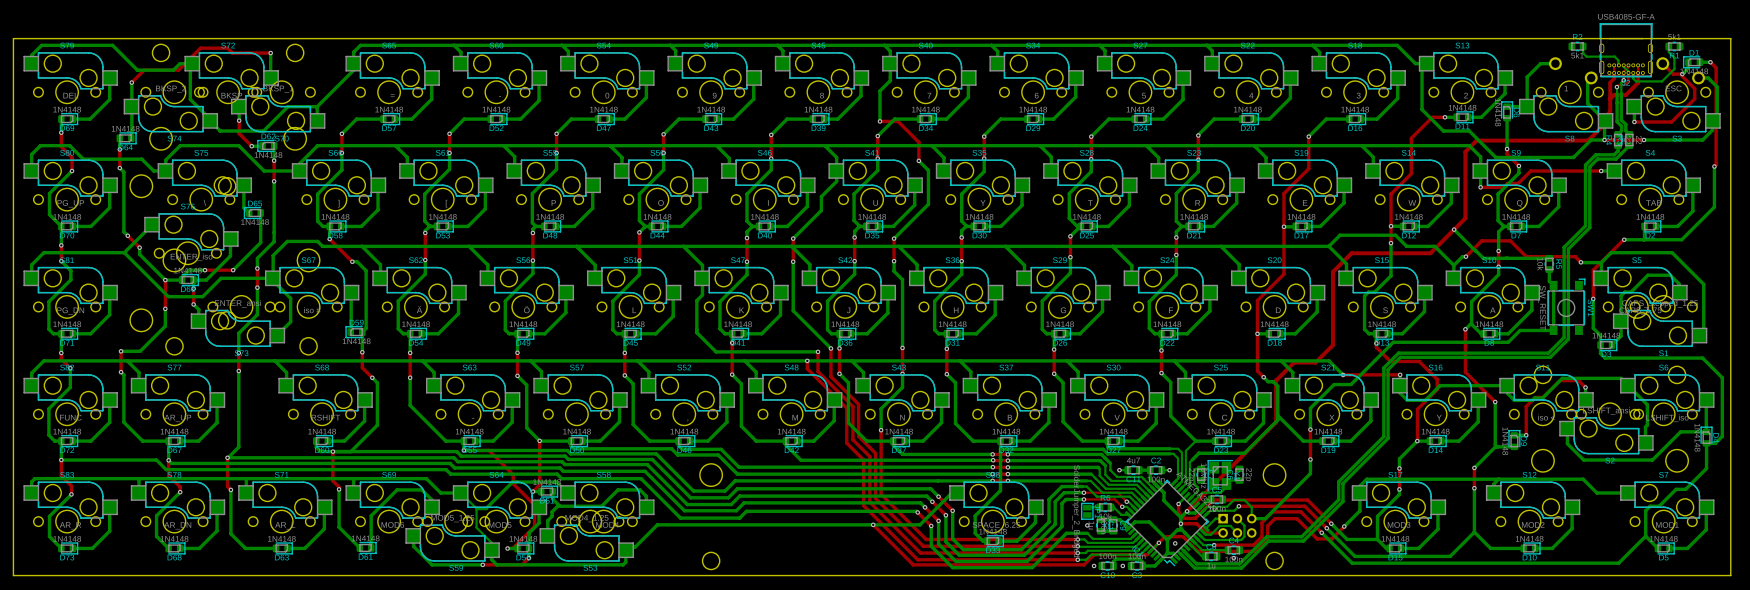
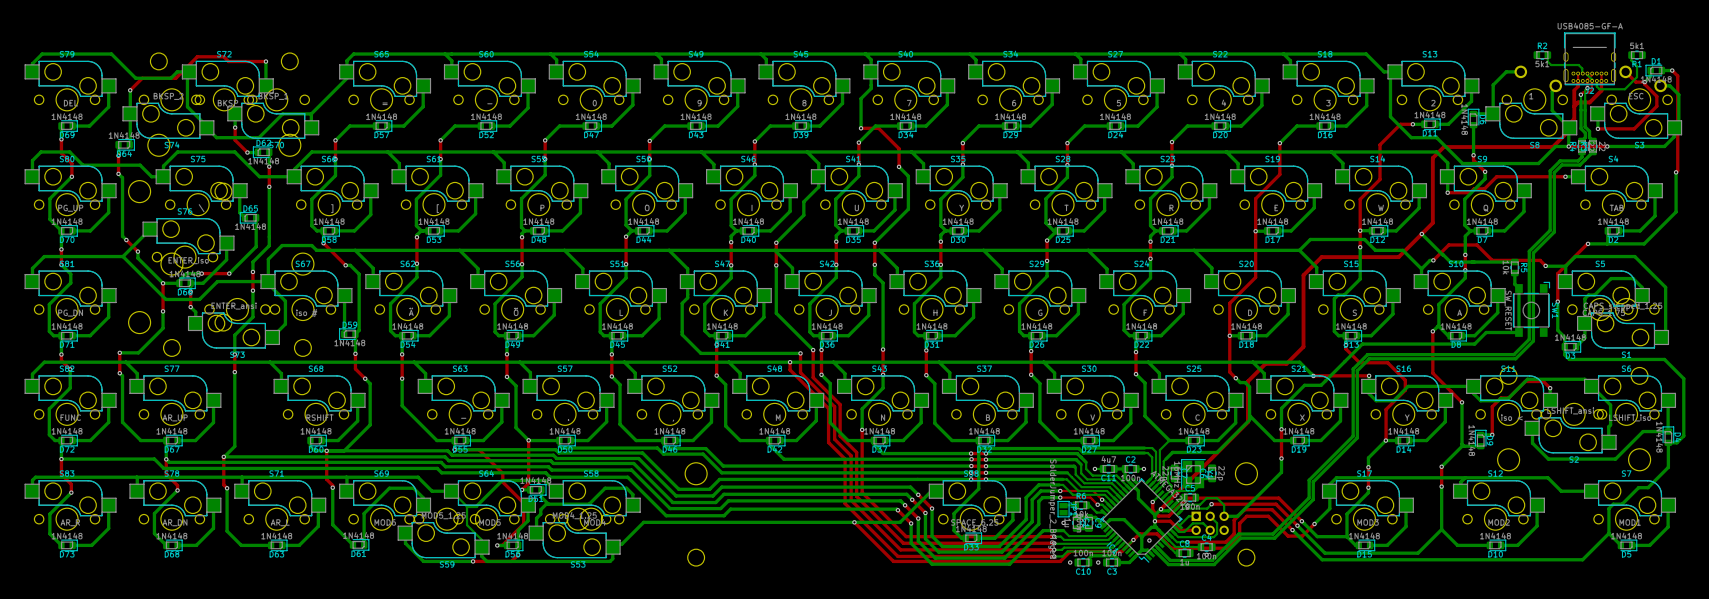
board edge: (1730, 38) (1730, 575) (13, 575) (13, 38) (1730, 38) -> none

